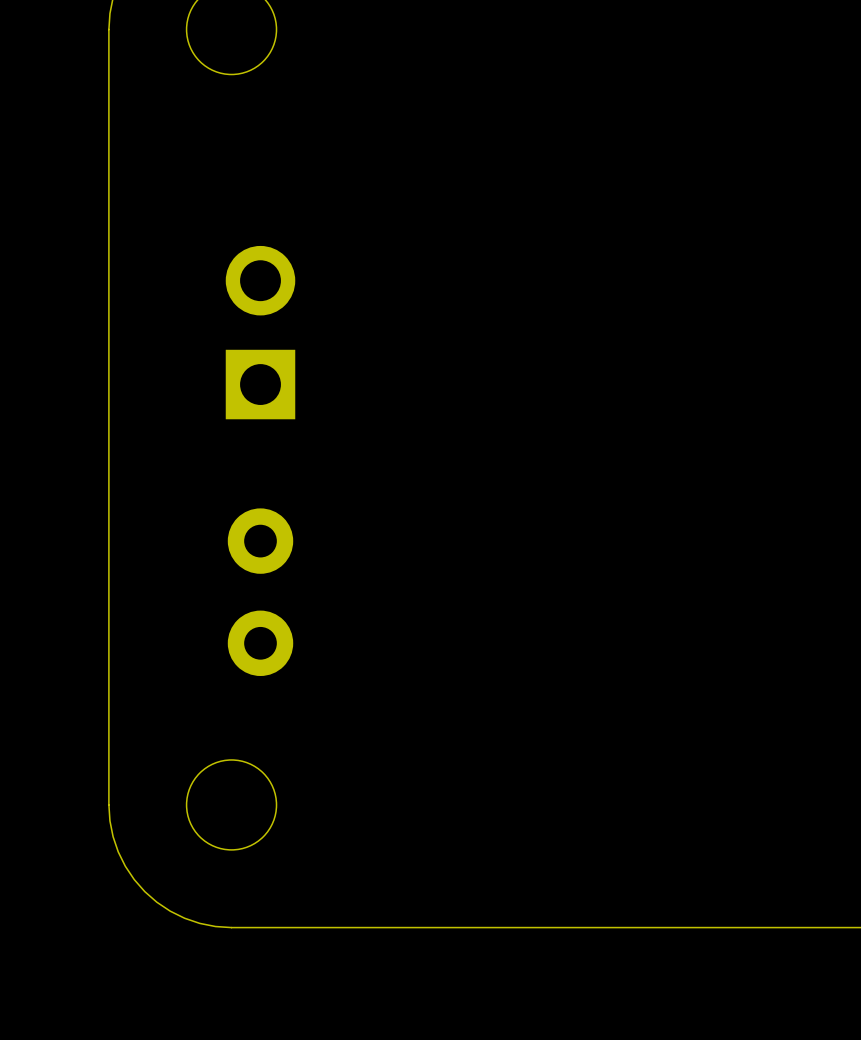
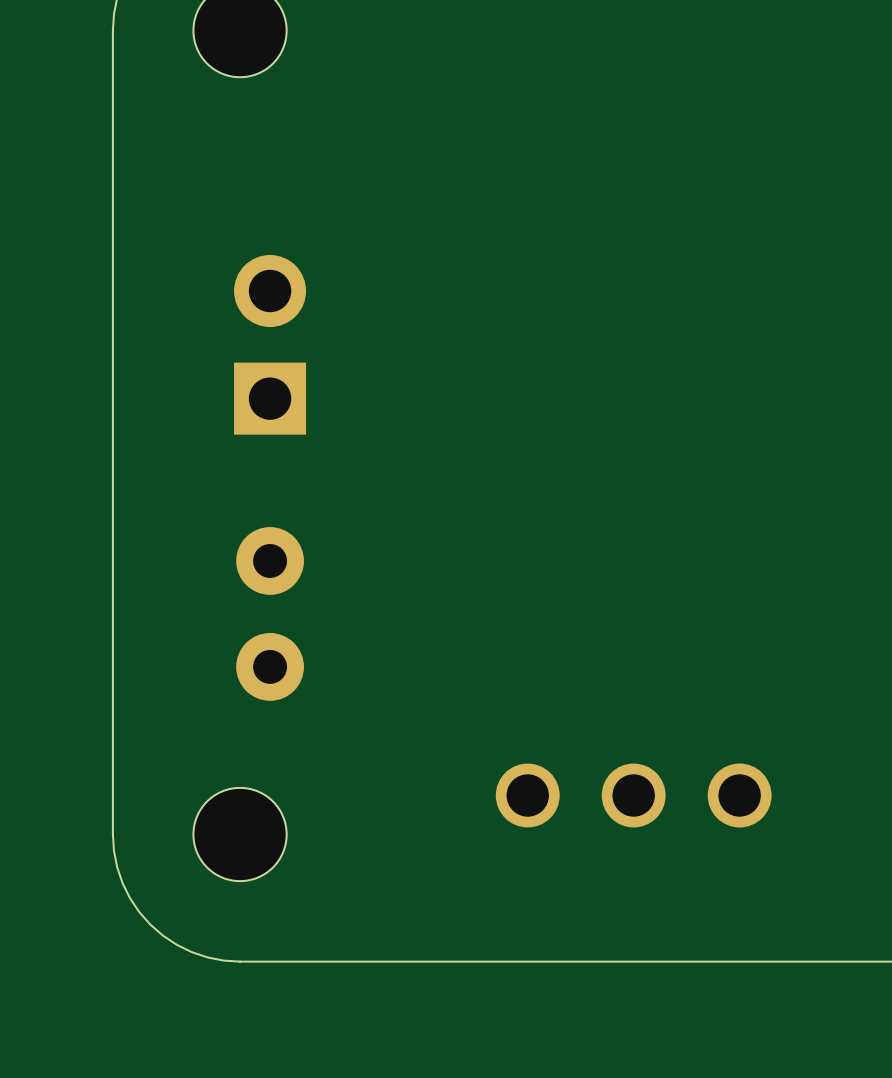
part: none -> (633, 795)

